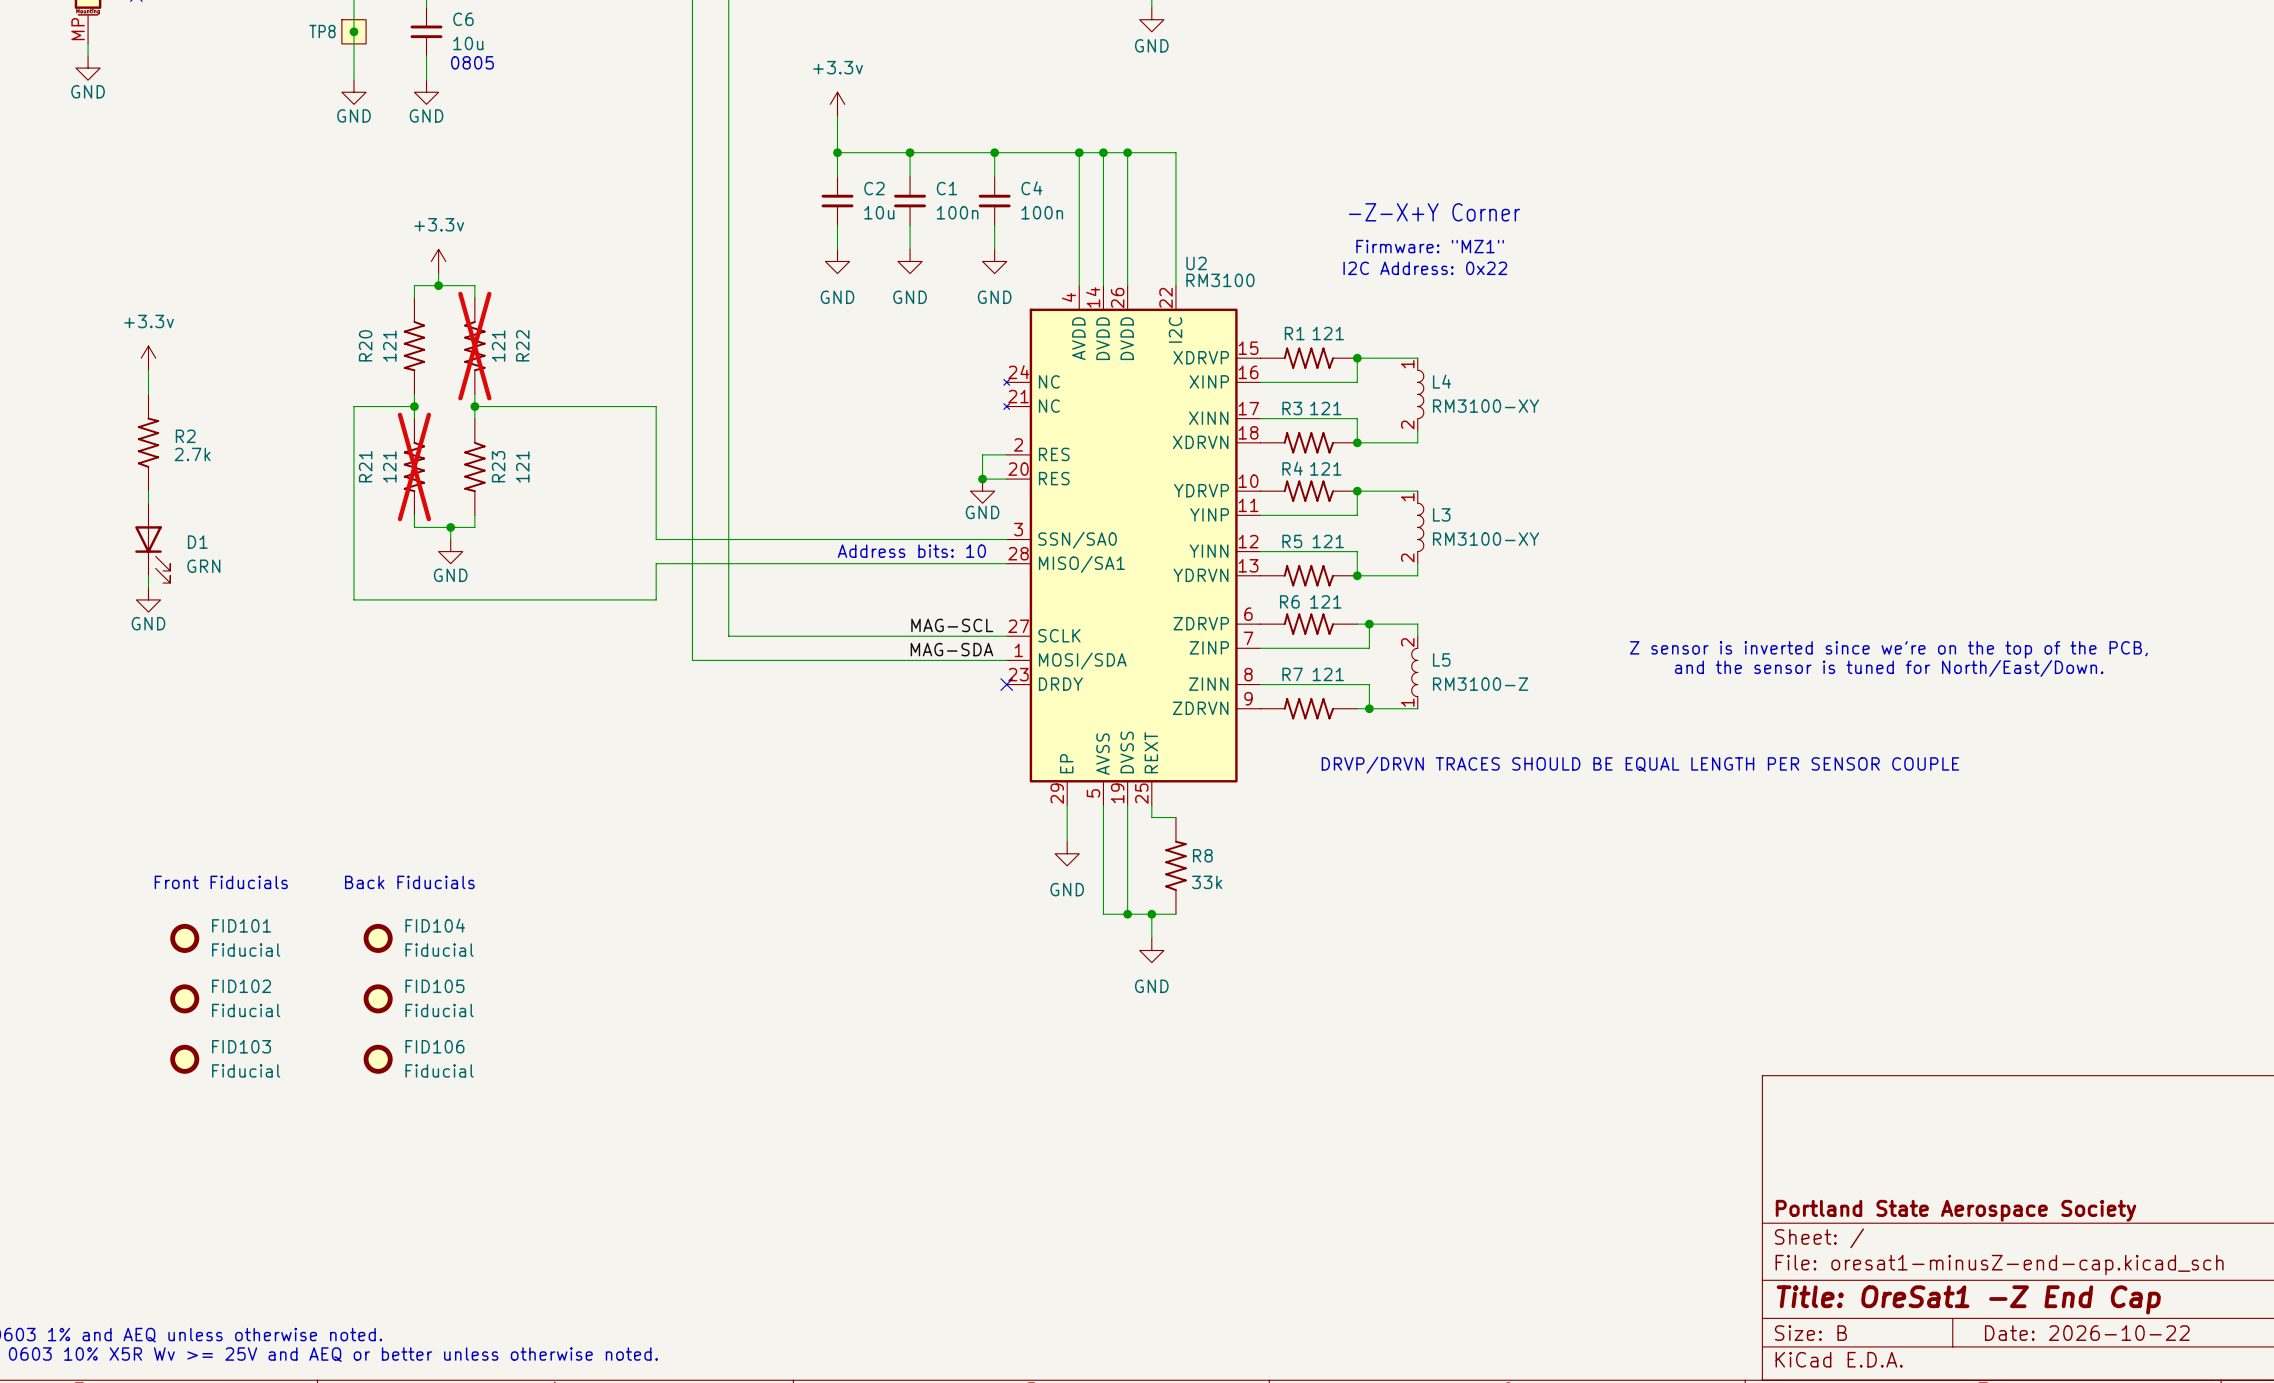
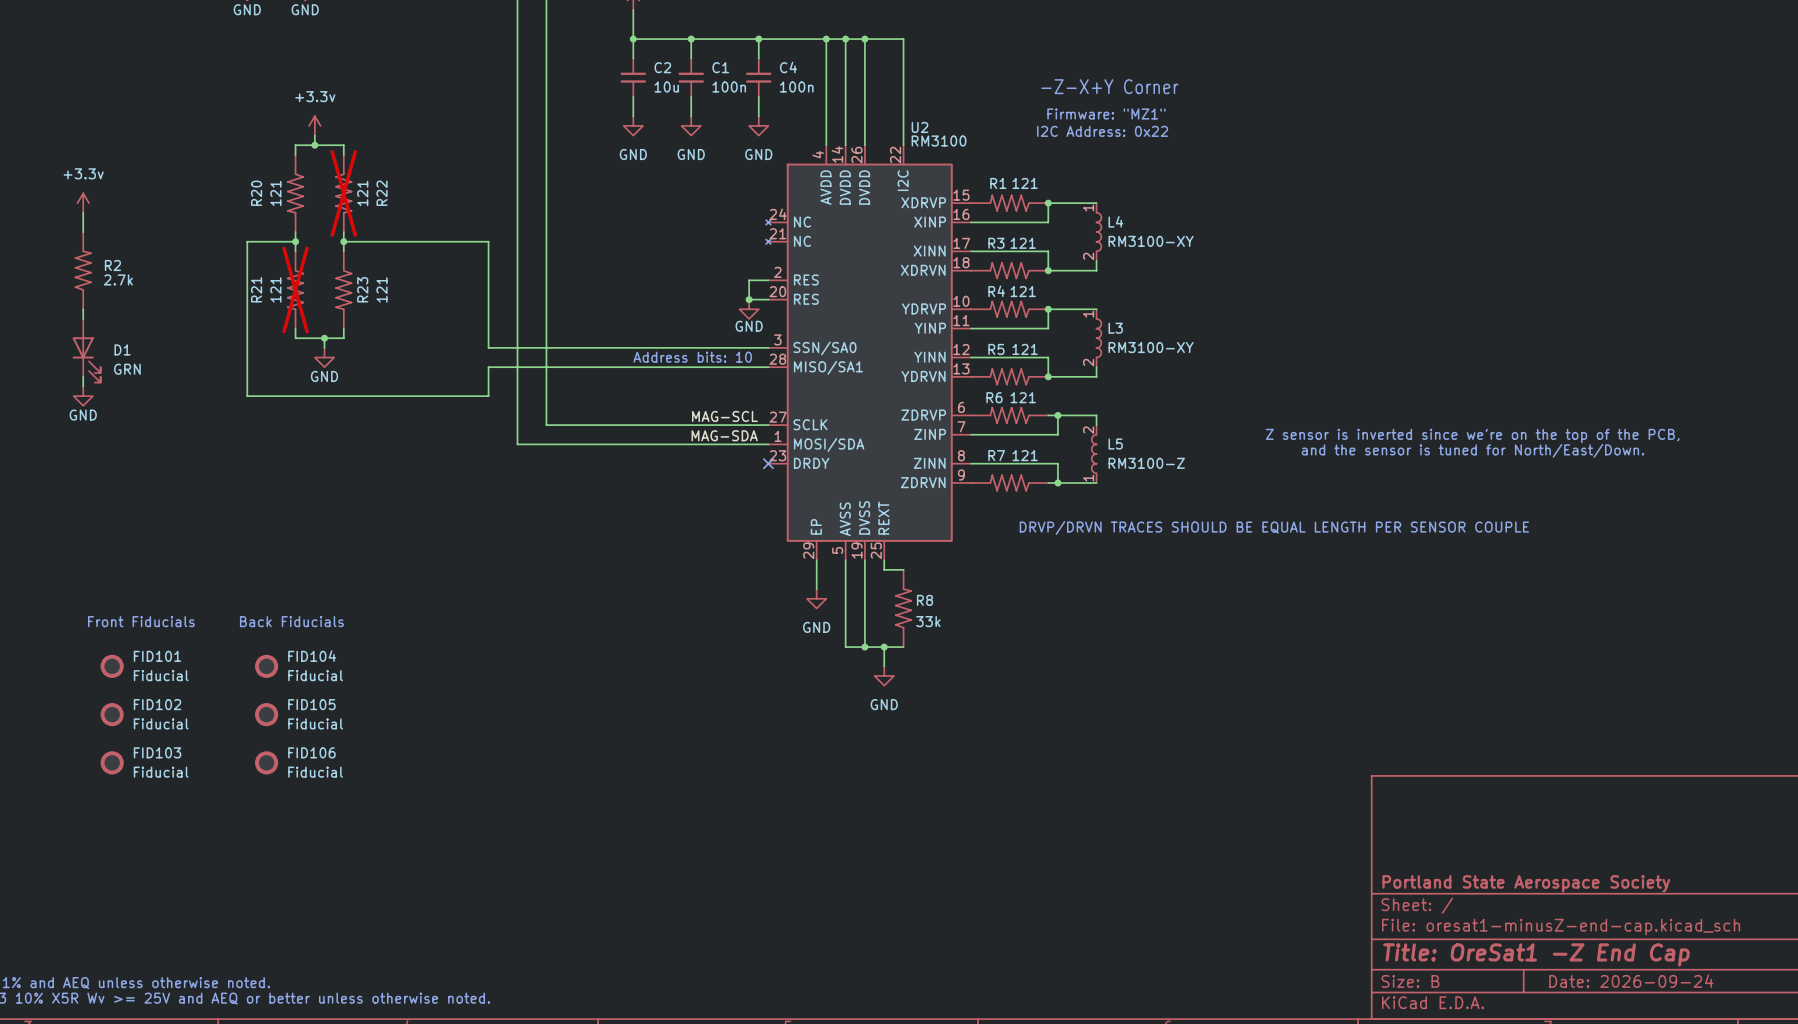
title block: Date: 2026-10-22 (2087, 1333) -> Date: 2026-09-24 (1631, 981)

